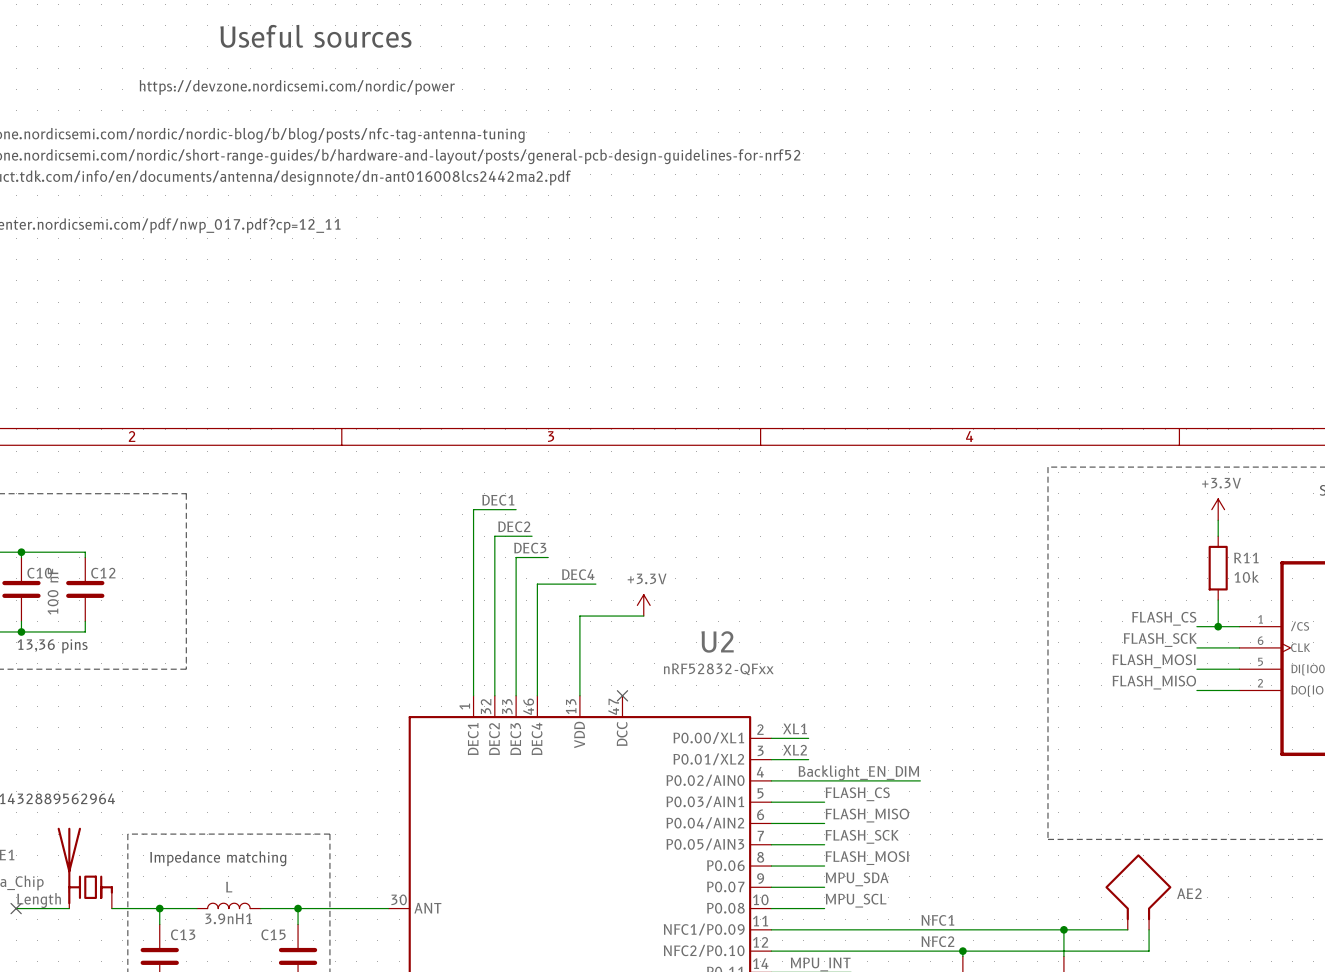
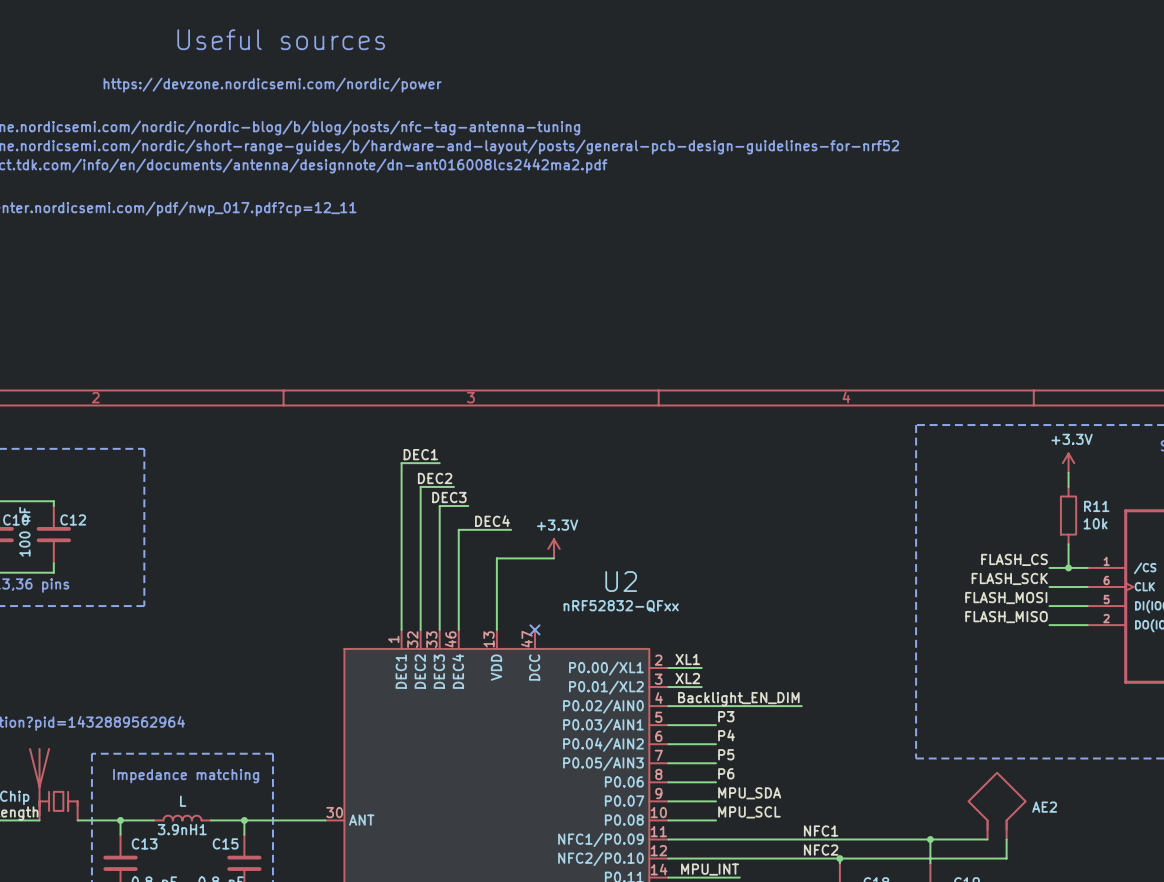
label: FLASH_CS (857, 794) -> P3 (726, 716)
label: FLASH_MISO (867, 815) -> P4 (726, 735)
label: FLASH_SCK (862, 836) -> P5 (726, 754)
label: FLASH_MOSI (867, 858) -> P6 (726, 773)

